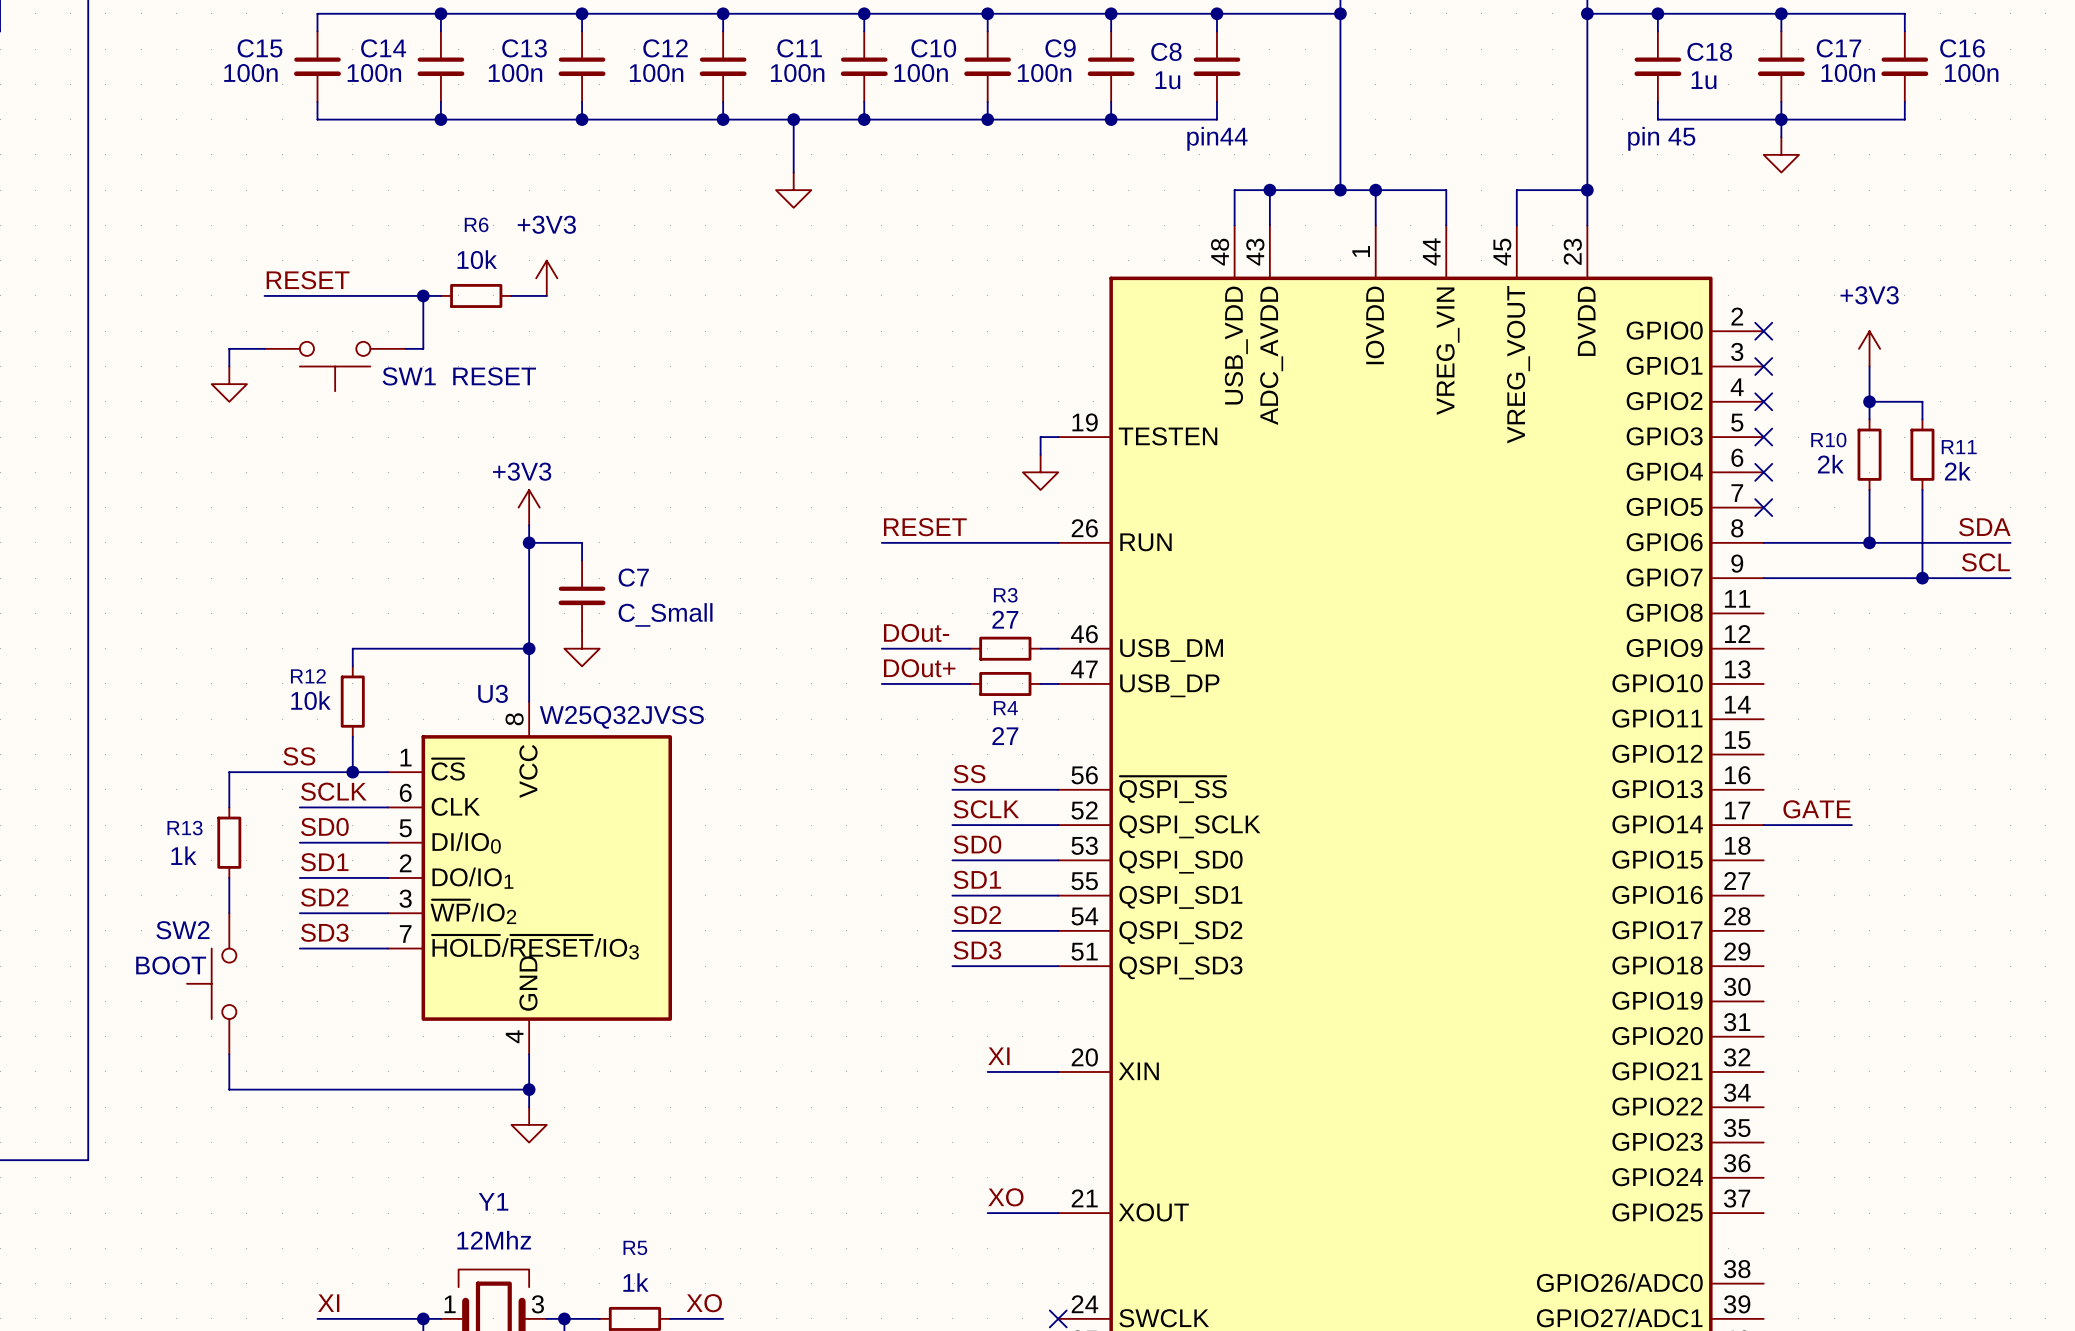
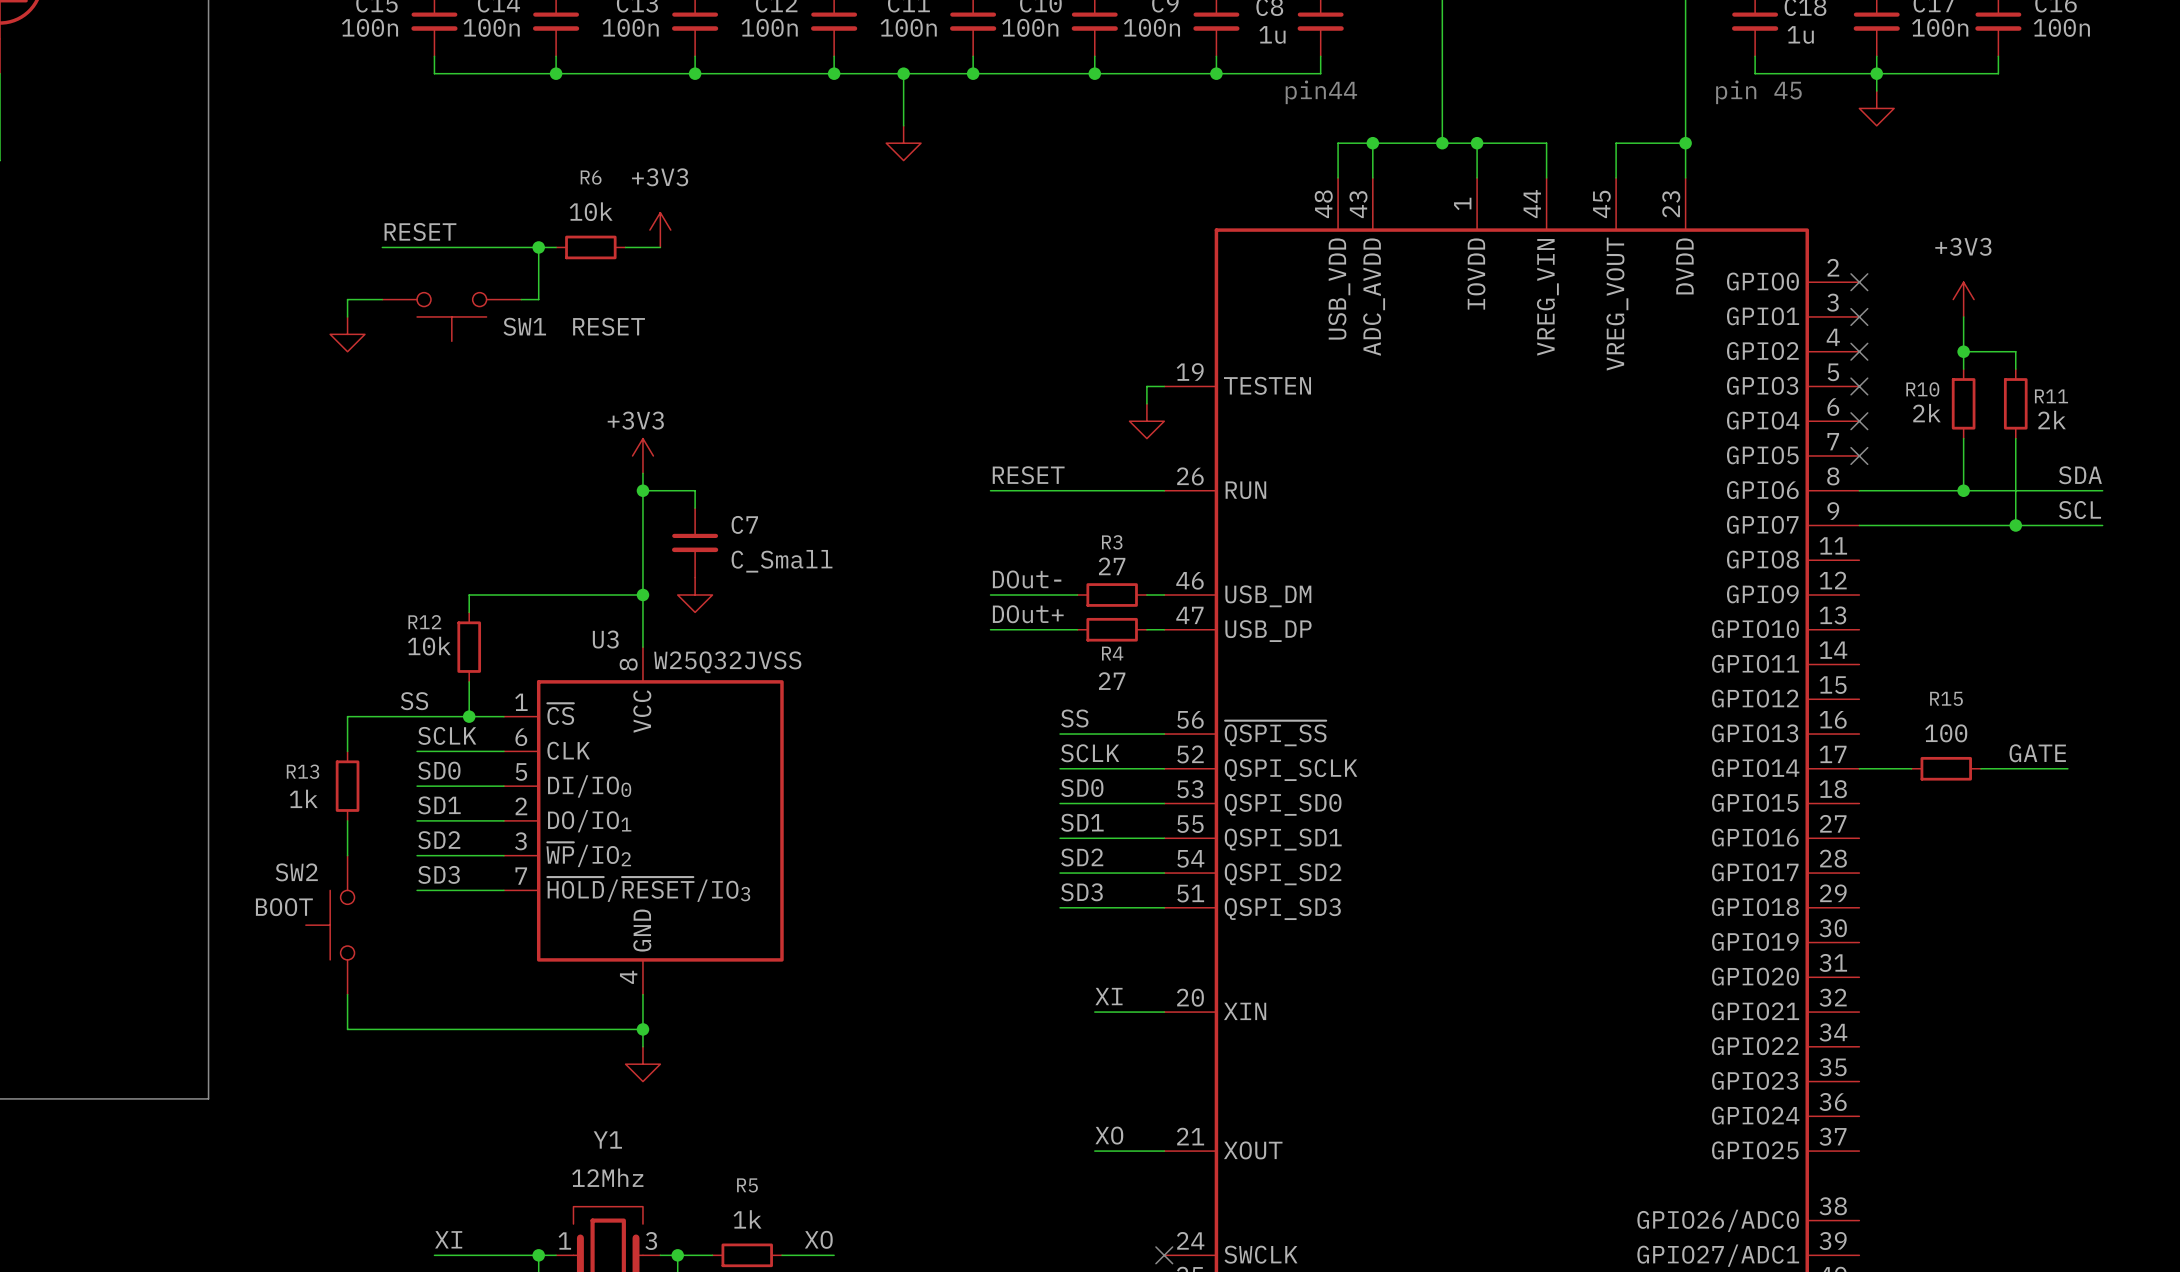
label position: GATE (1817, 809) -> GATE (2037, 753)
wire: (1816, 825) (1851, 825) -> none
R15: none -> 100 (1946, 768)
wire: none -> (1981, 768) (2067, 768)

